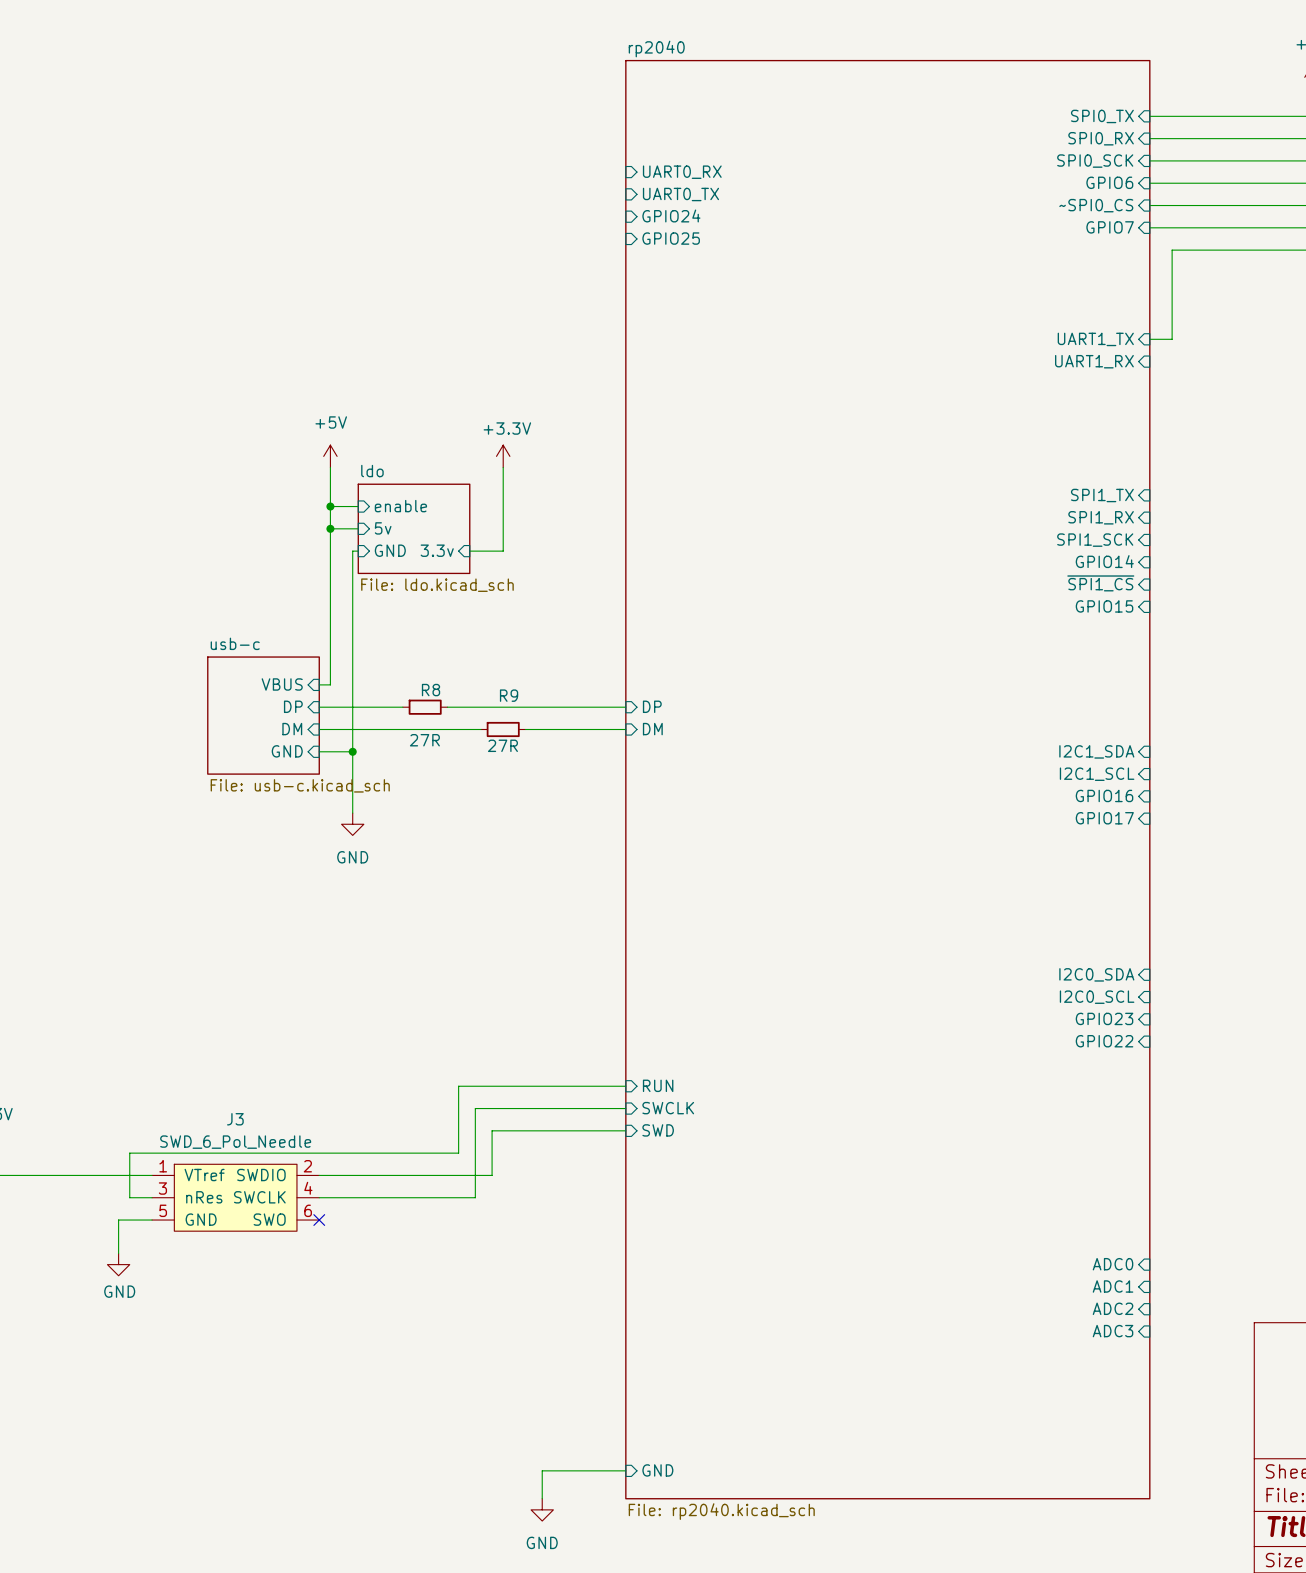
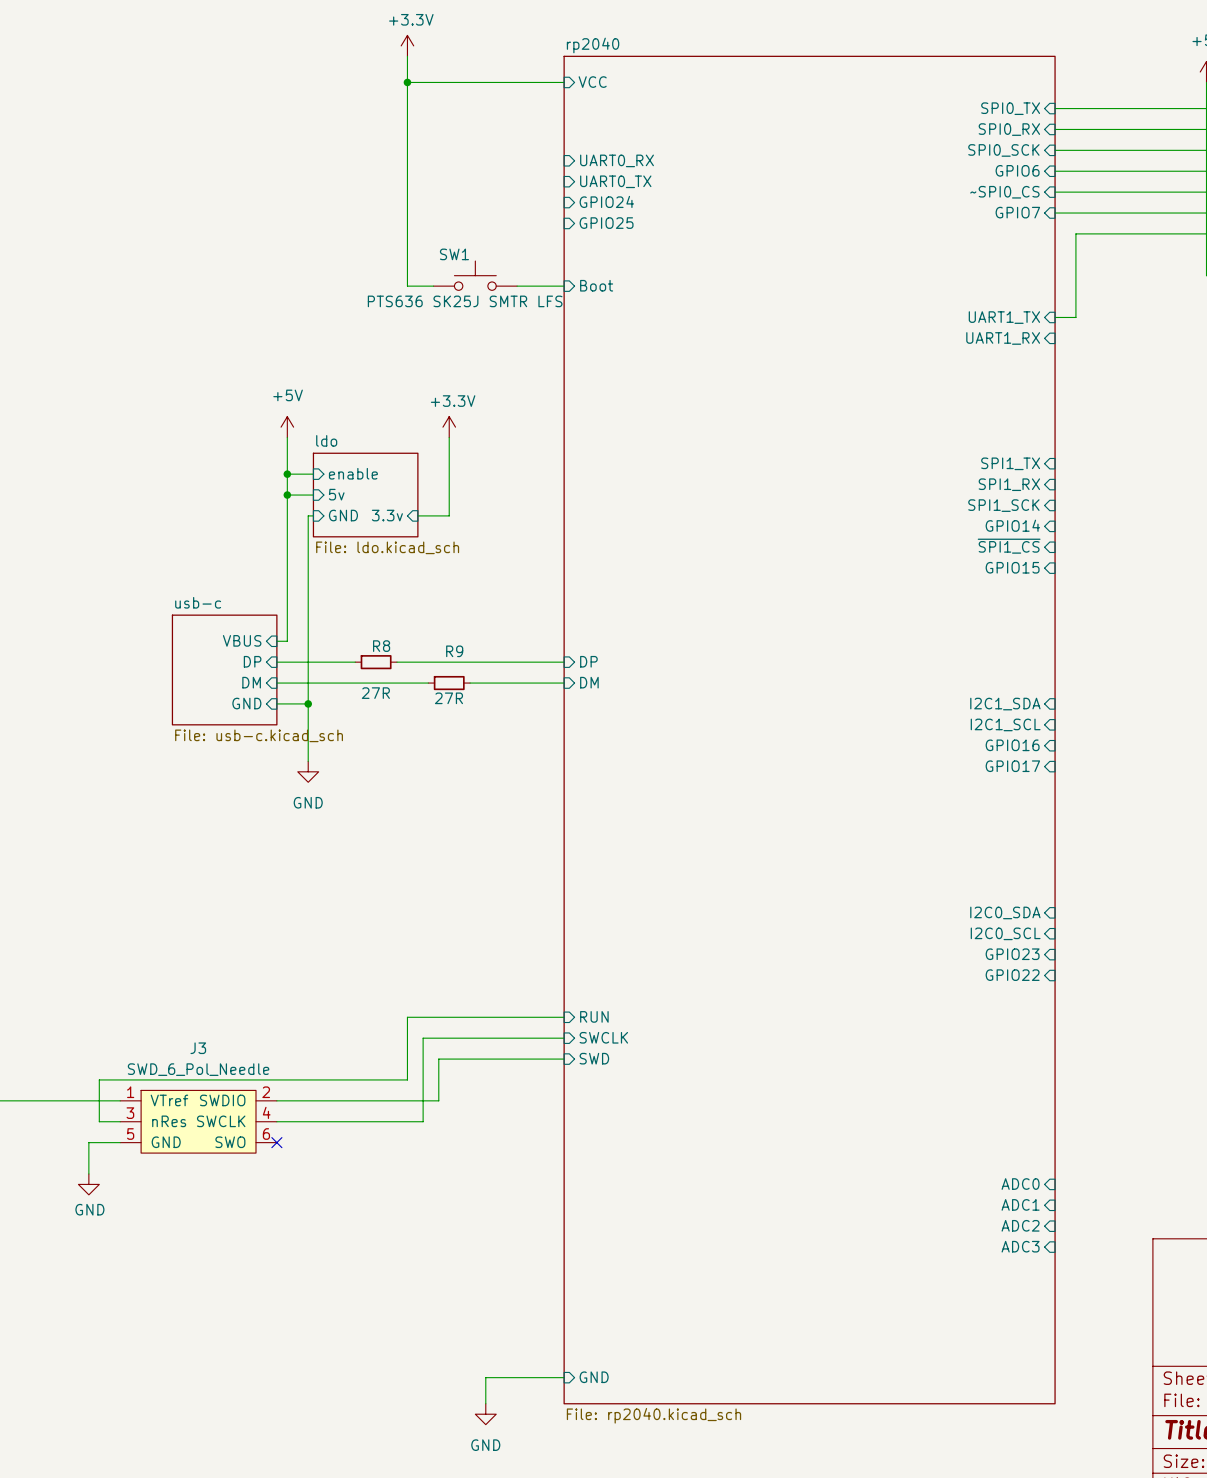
power symbol: none -> +3.3V (407, 45)
wire: none -> (407, 56) (407, 286) (433, 286)
wire: none -> (407, 82) (564, 82)
junction: none -> (407, 82)
sheet pin: none -> VCC (592, 82)
SW1: none -> PTS636 SK25J SMTR LFS (475, 275)
wire: none -> (517, 286) (564, 286)
sheet pin: none -> Boot (596, 285)

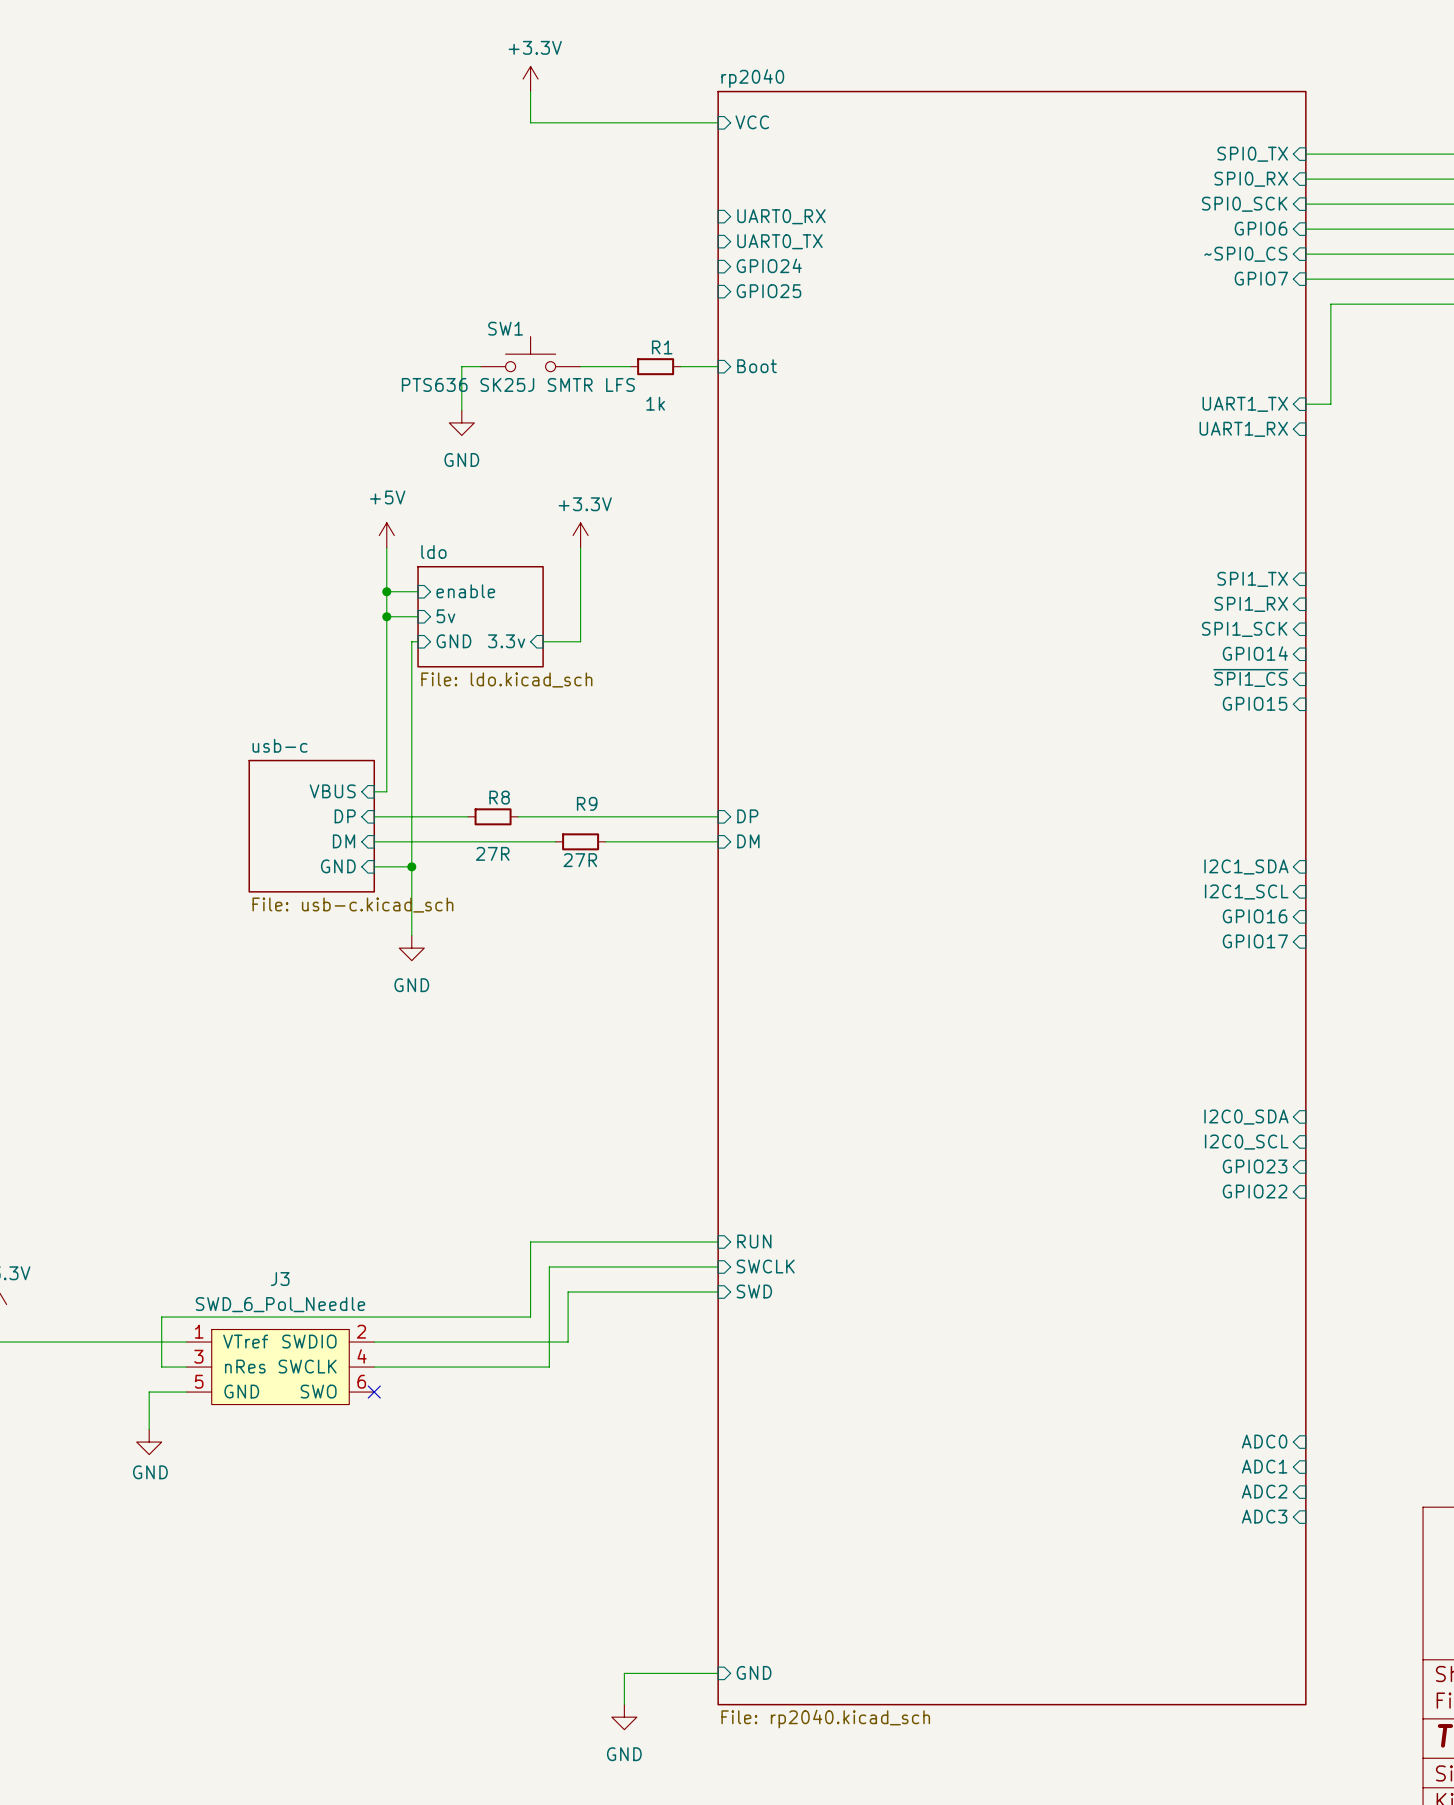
wire: (407, 82) (407, 286) (433, 286) -> none
junction: (407, 82) -> none
SW1 position: (475, 275) -> (530, 354)
wire: none -> (480, 366) (461, 366) (461, 410)
wire: none -> (580, 366) (630, 366)
R1: none -> 1k (655, 366)
wire: (517, 286) (532, 286) -> none
power symbol: none -> GND (461, 422)

